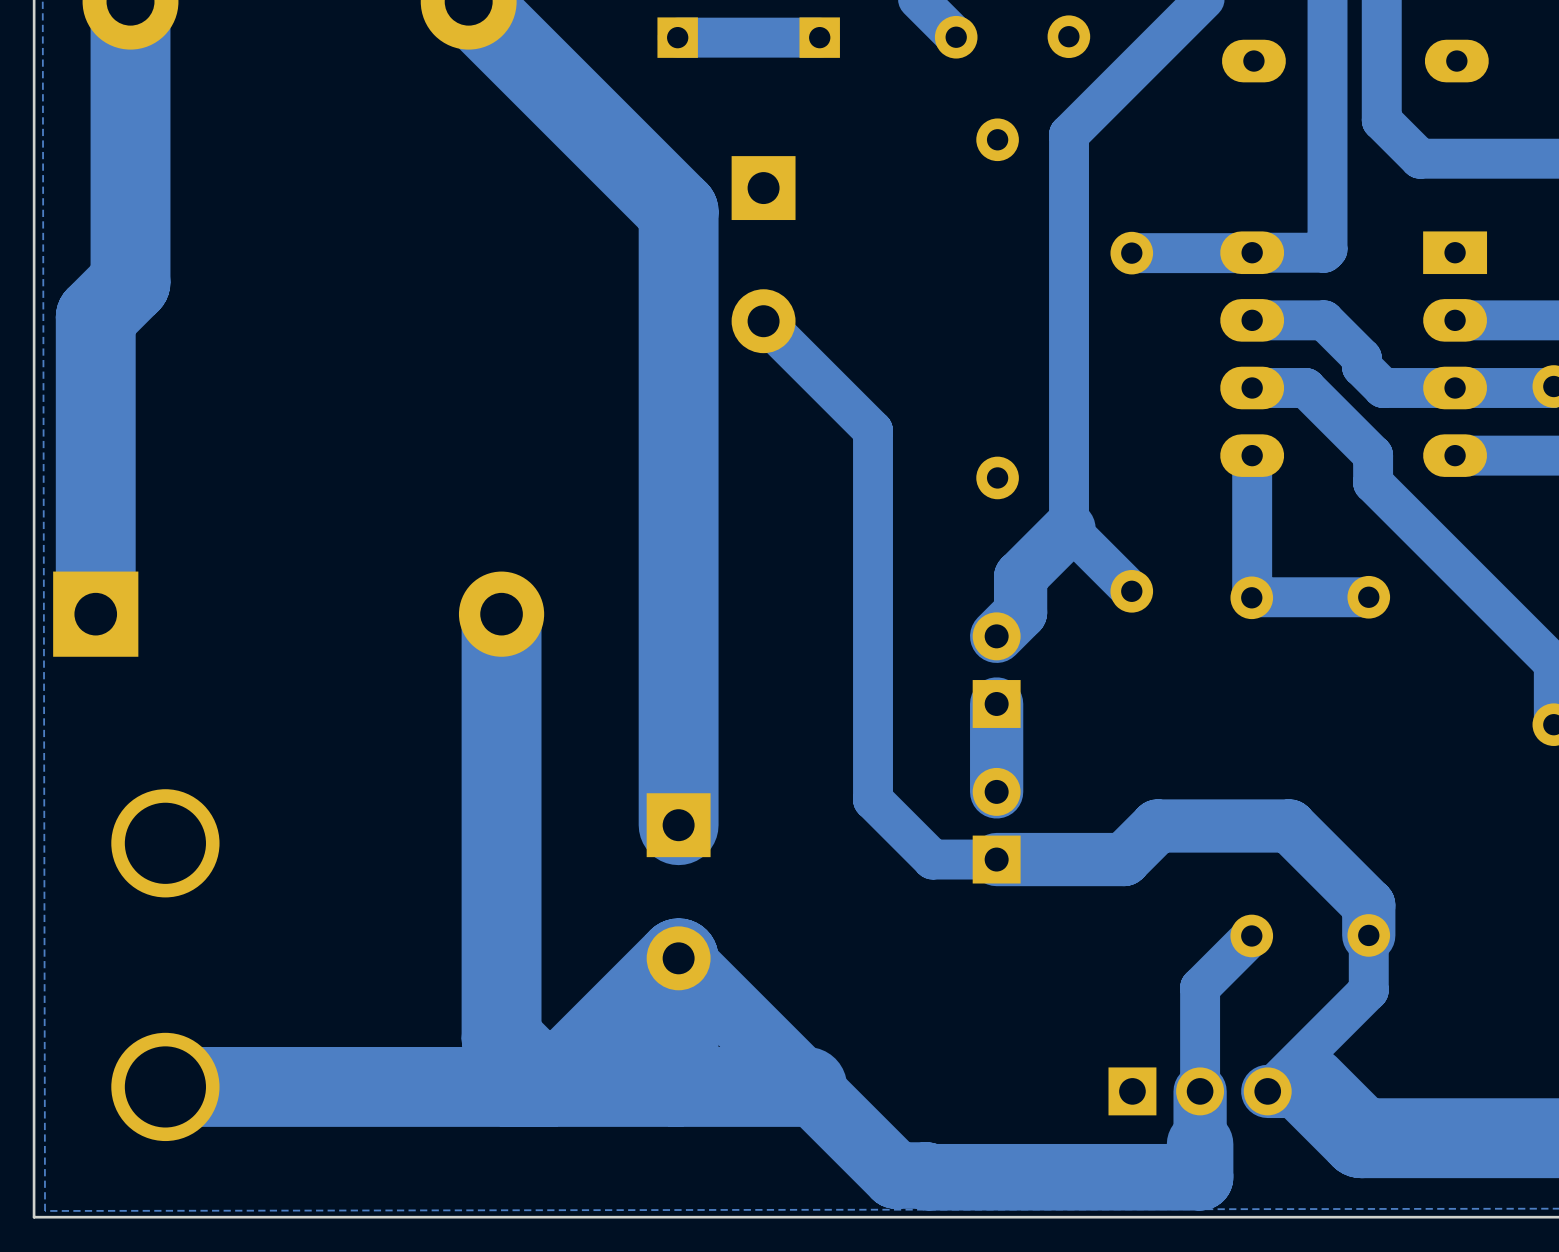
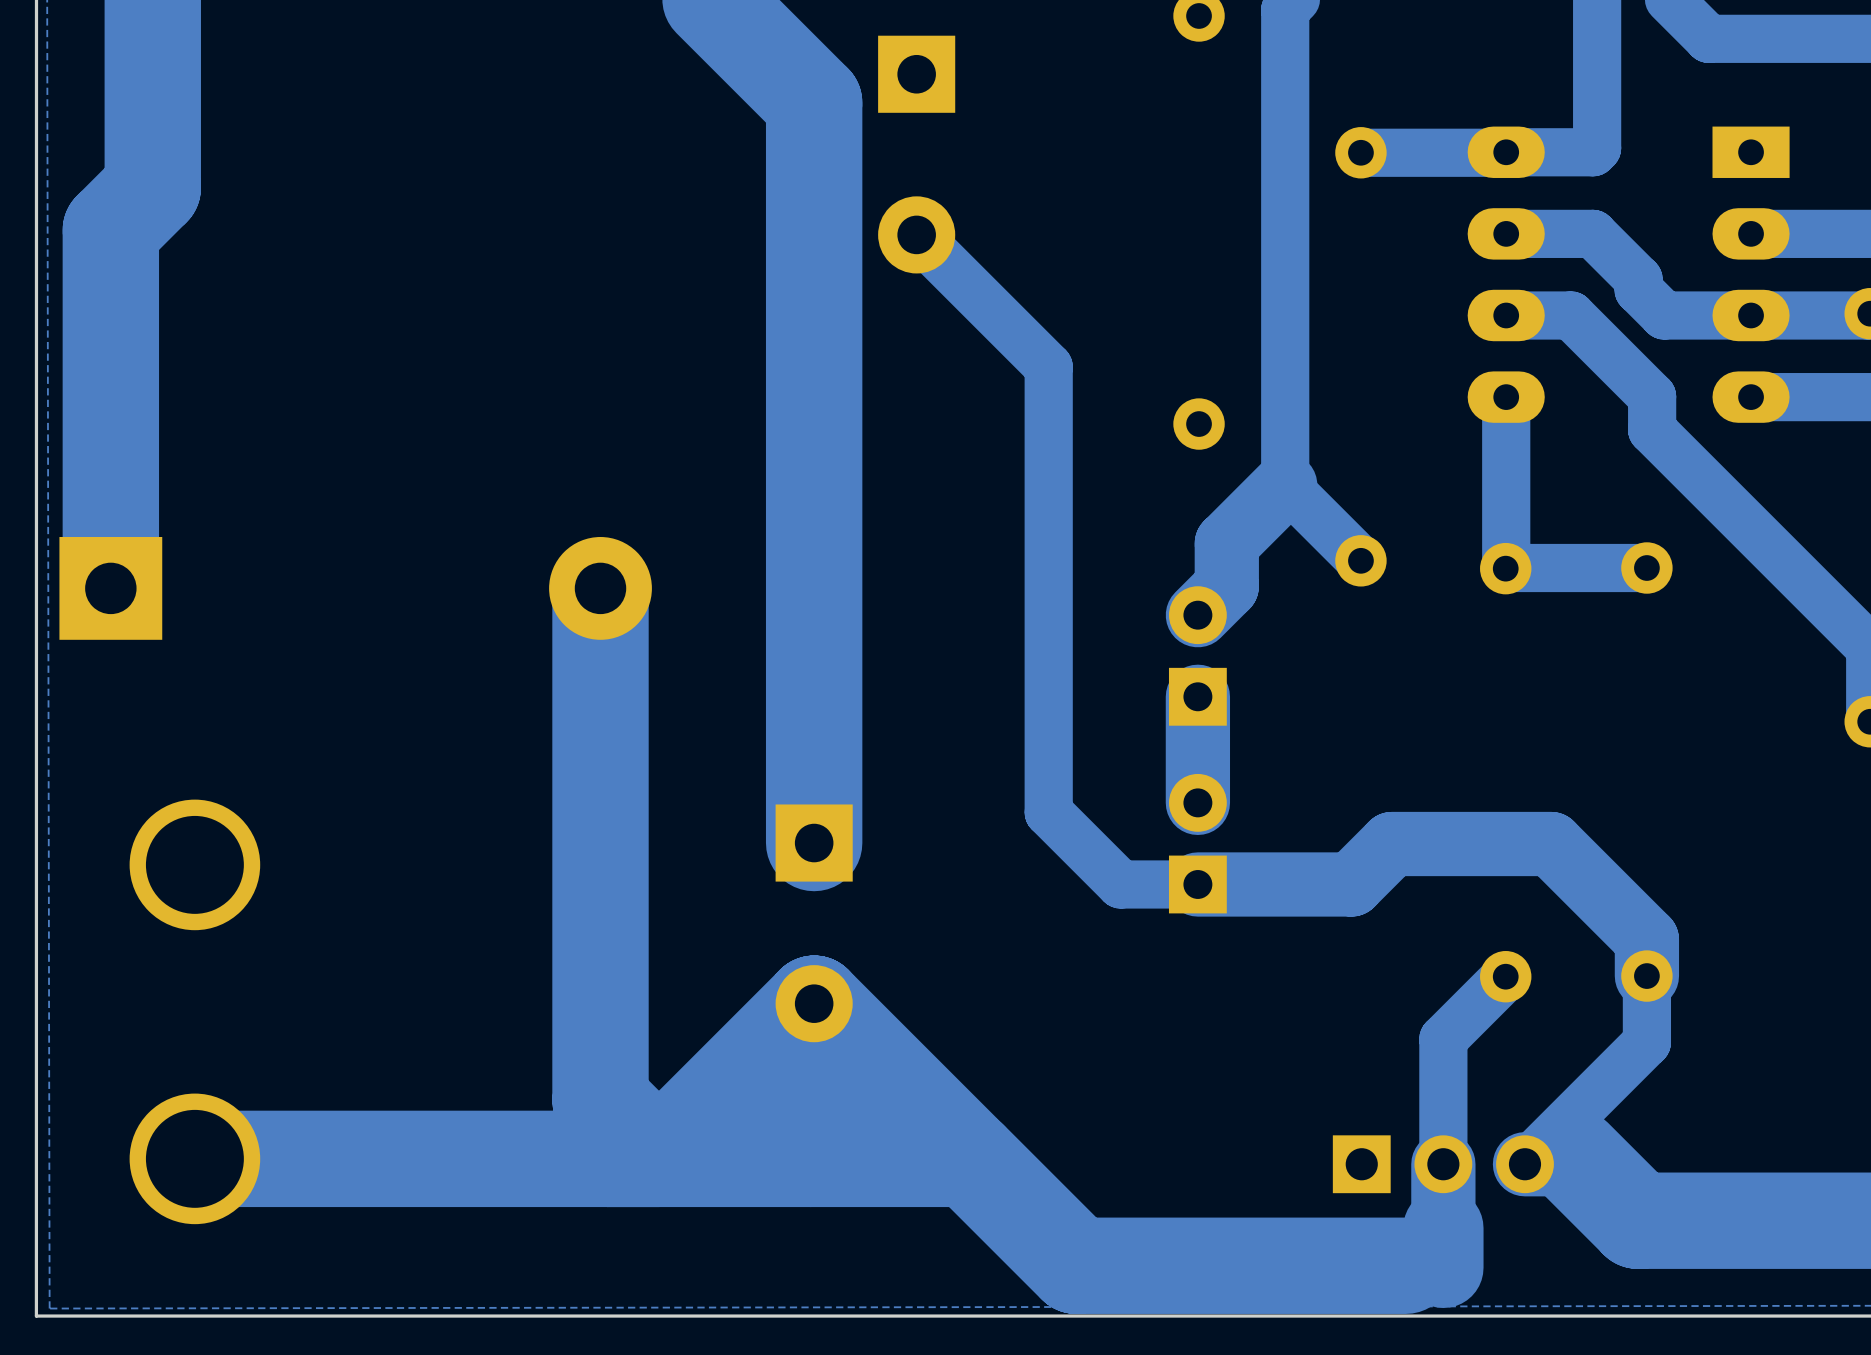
track width: thin (678, 958) (895, 1175) (926, 1175) -> thick (814, 1003) (1076, 1265) (1113, 1265)
track: (926, 1175) (928, 1177) (1200, 1177) -> (1113, 1265) (1405, 1265) (1443, 1228)

